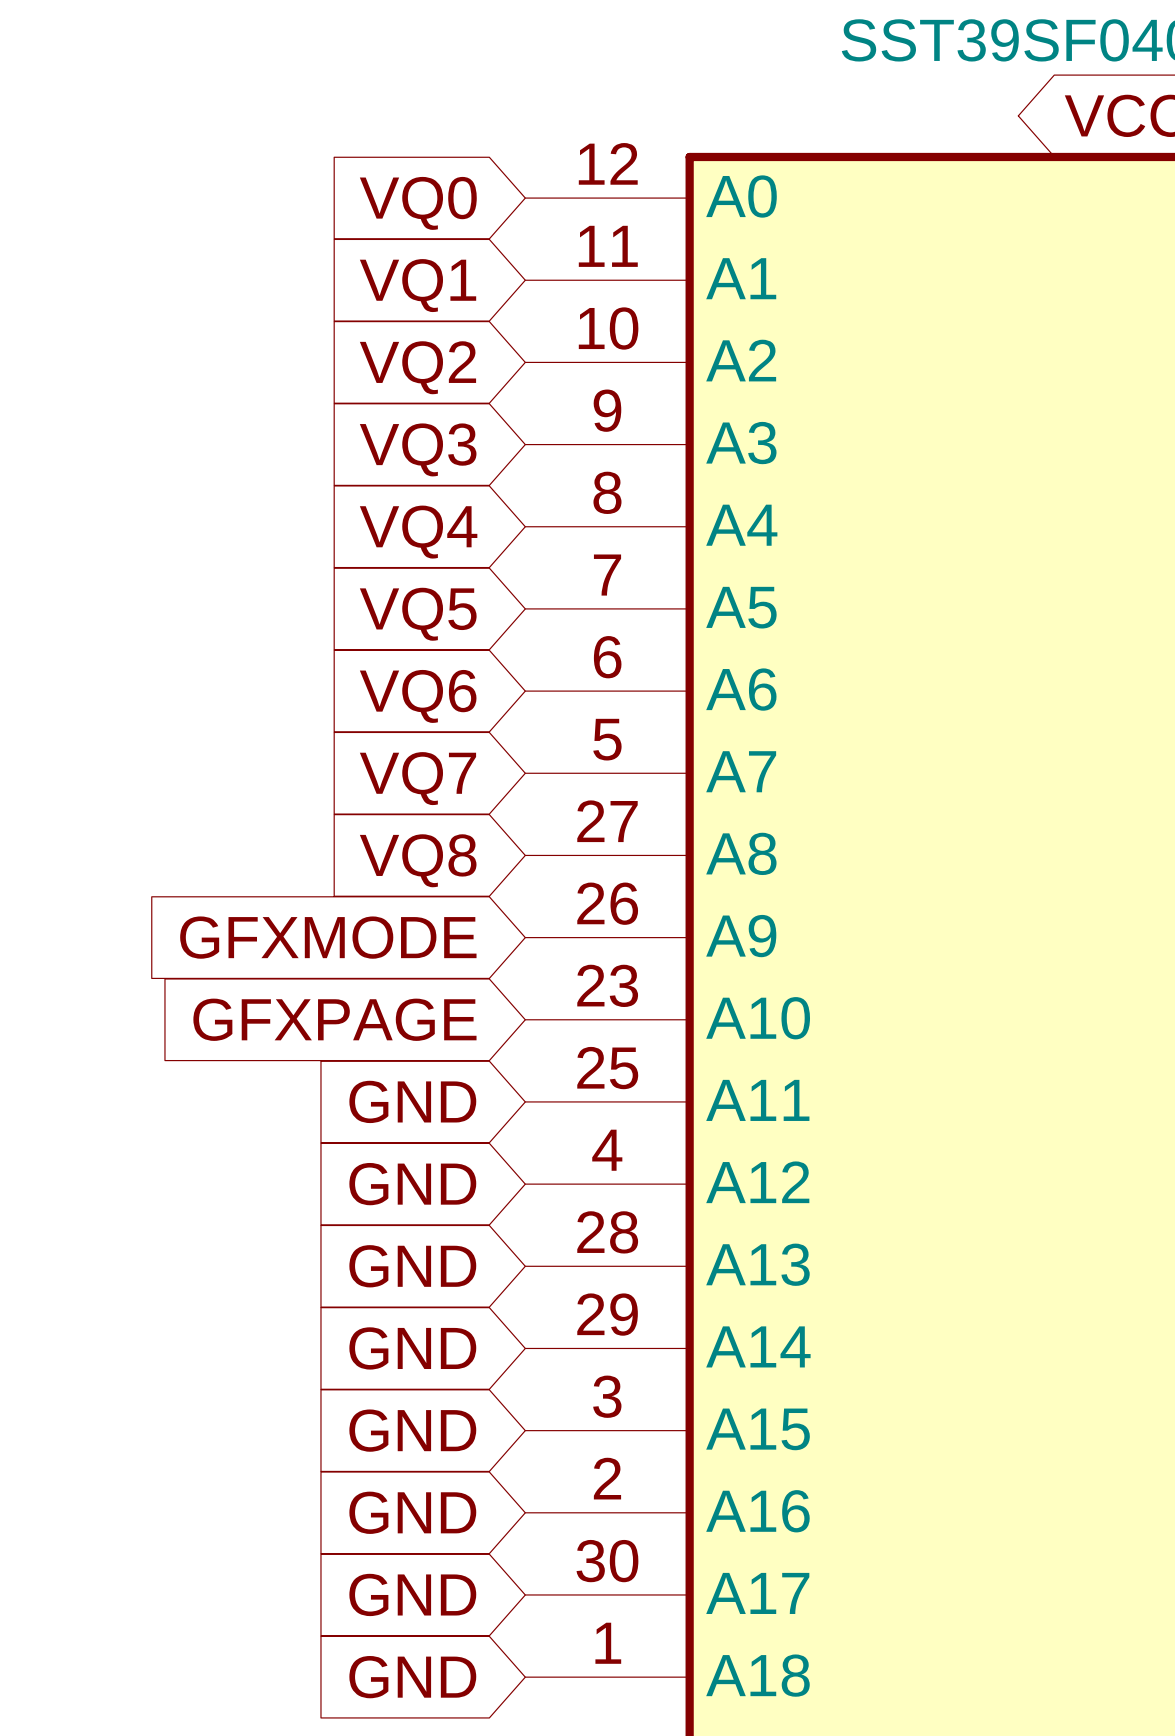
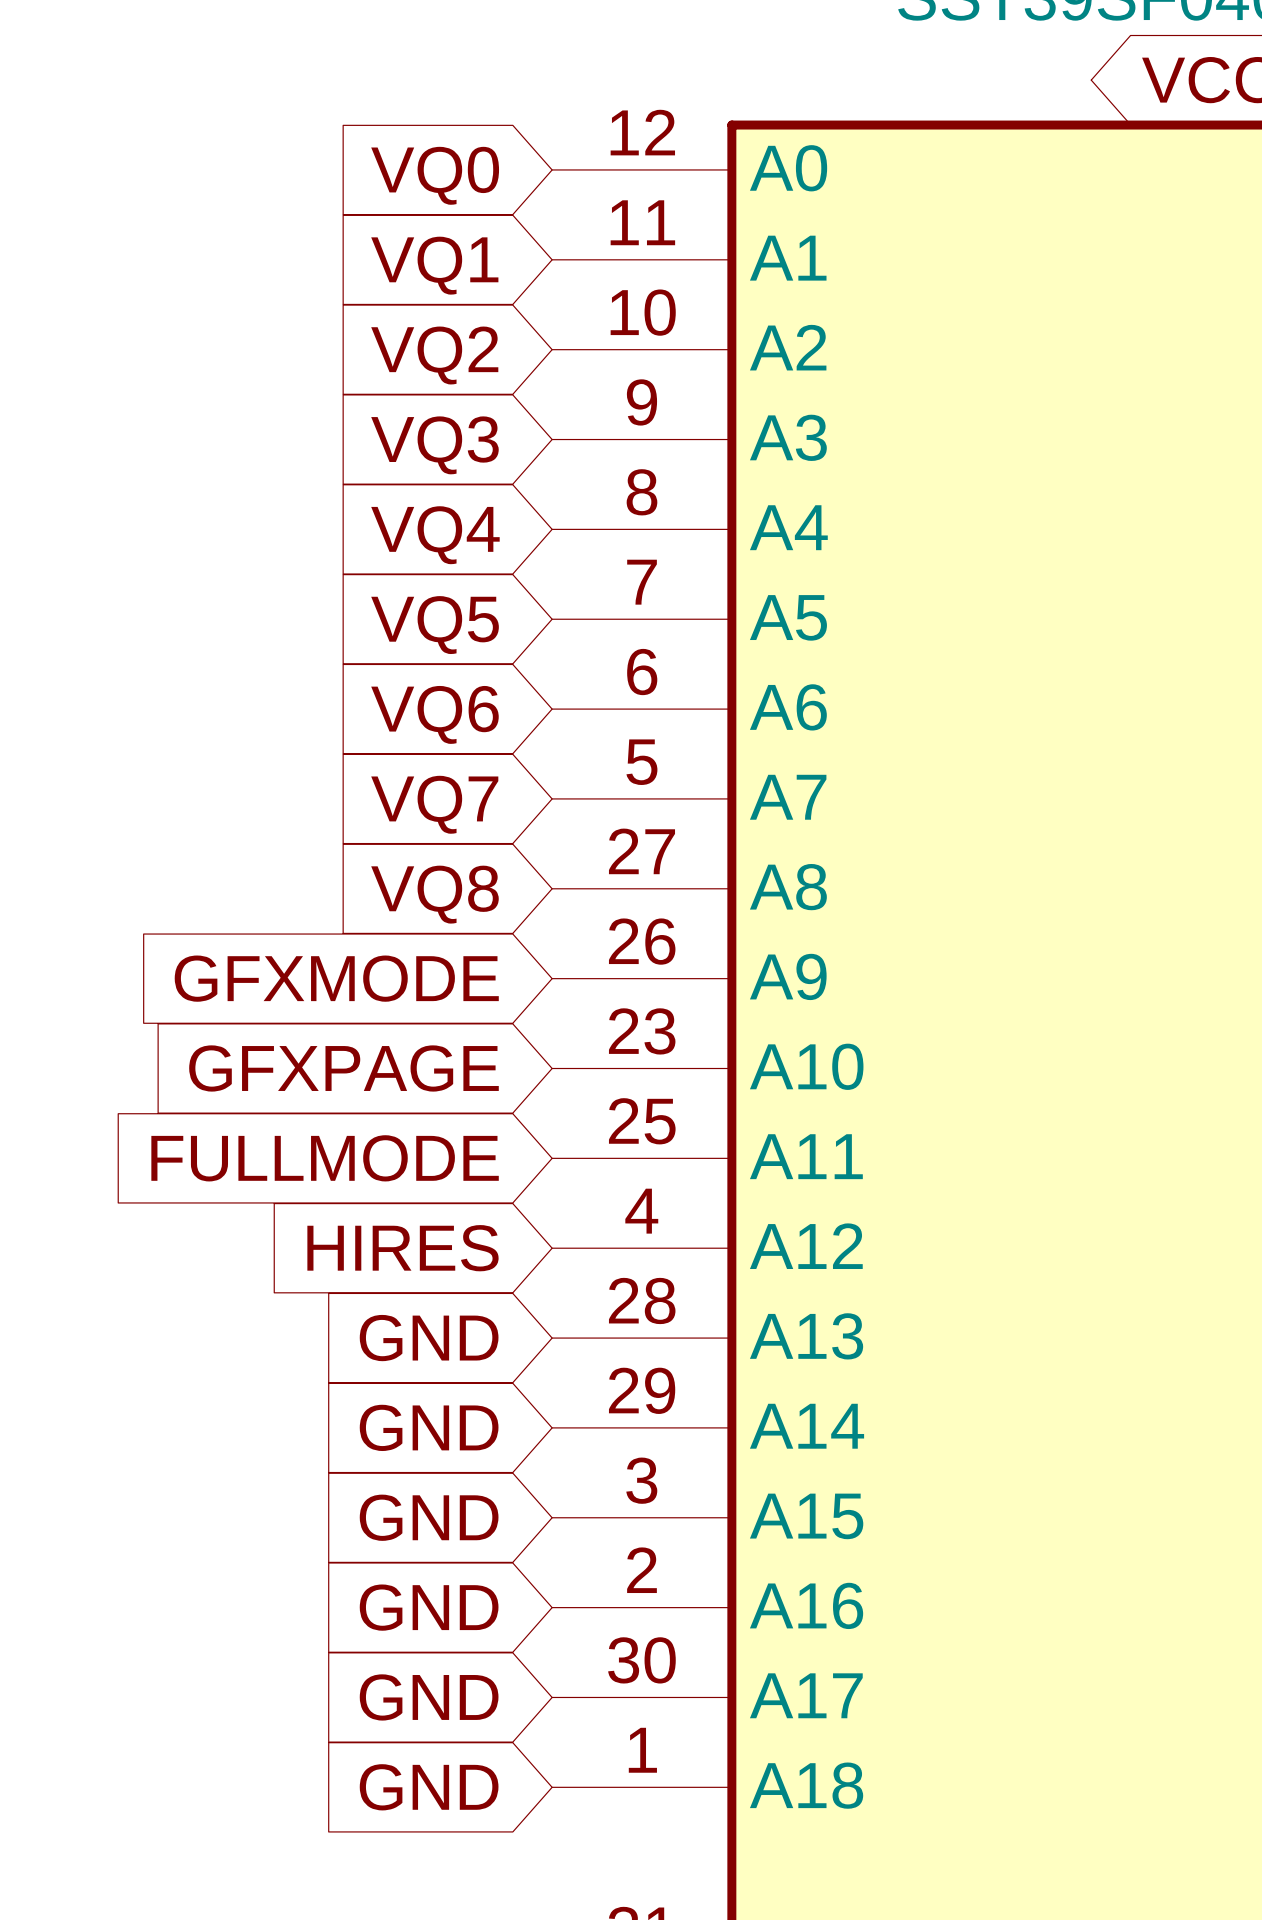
global label: GND (412, 1101) -> FULLMODE (325, 1158)
global label: GND (412, 1184) -> HIRES (402, 1248)

